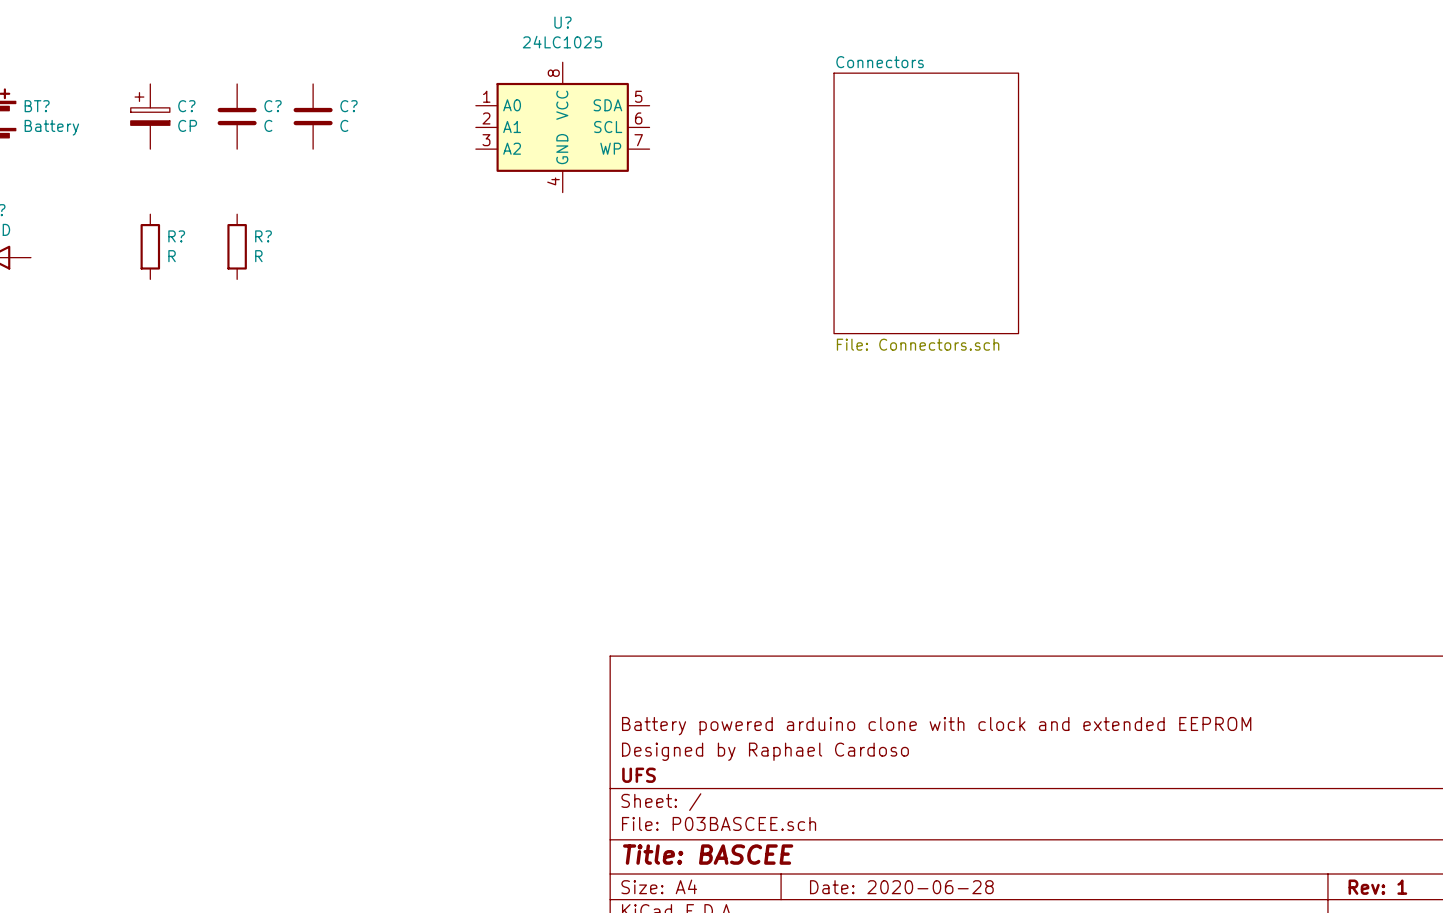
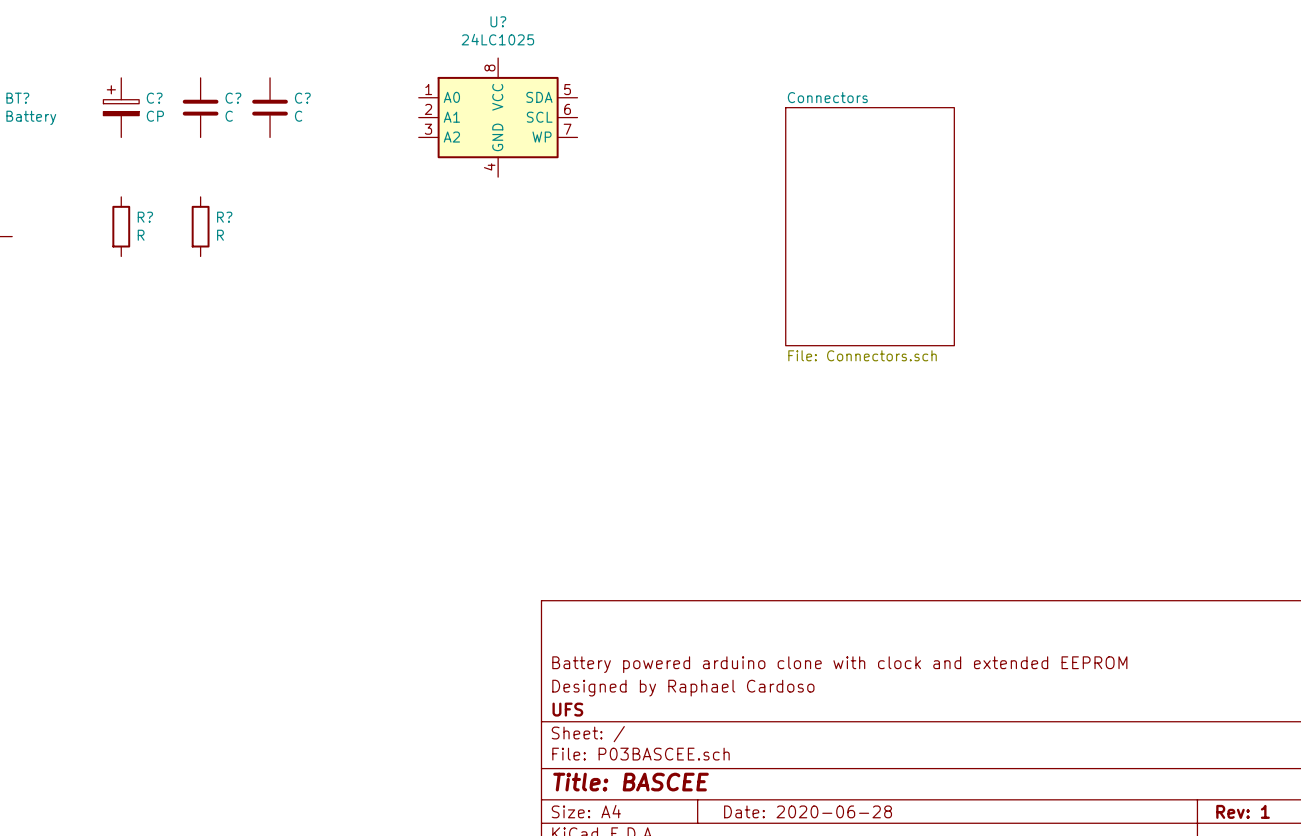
sheet Connectors position: (926, 203) -> (870, 226)

